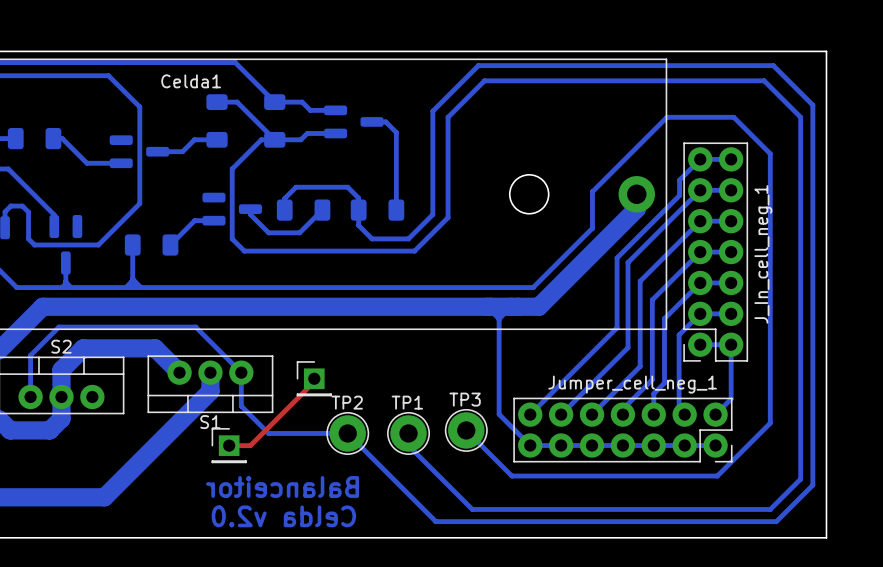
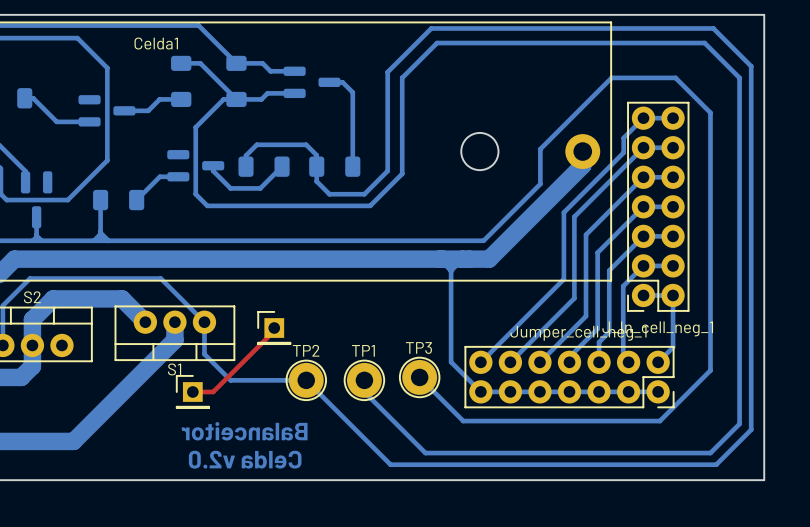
J_In_cell_neg_1 name rotation: 0° (763, 254) -> 90° clockwise (657, 328)

